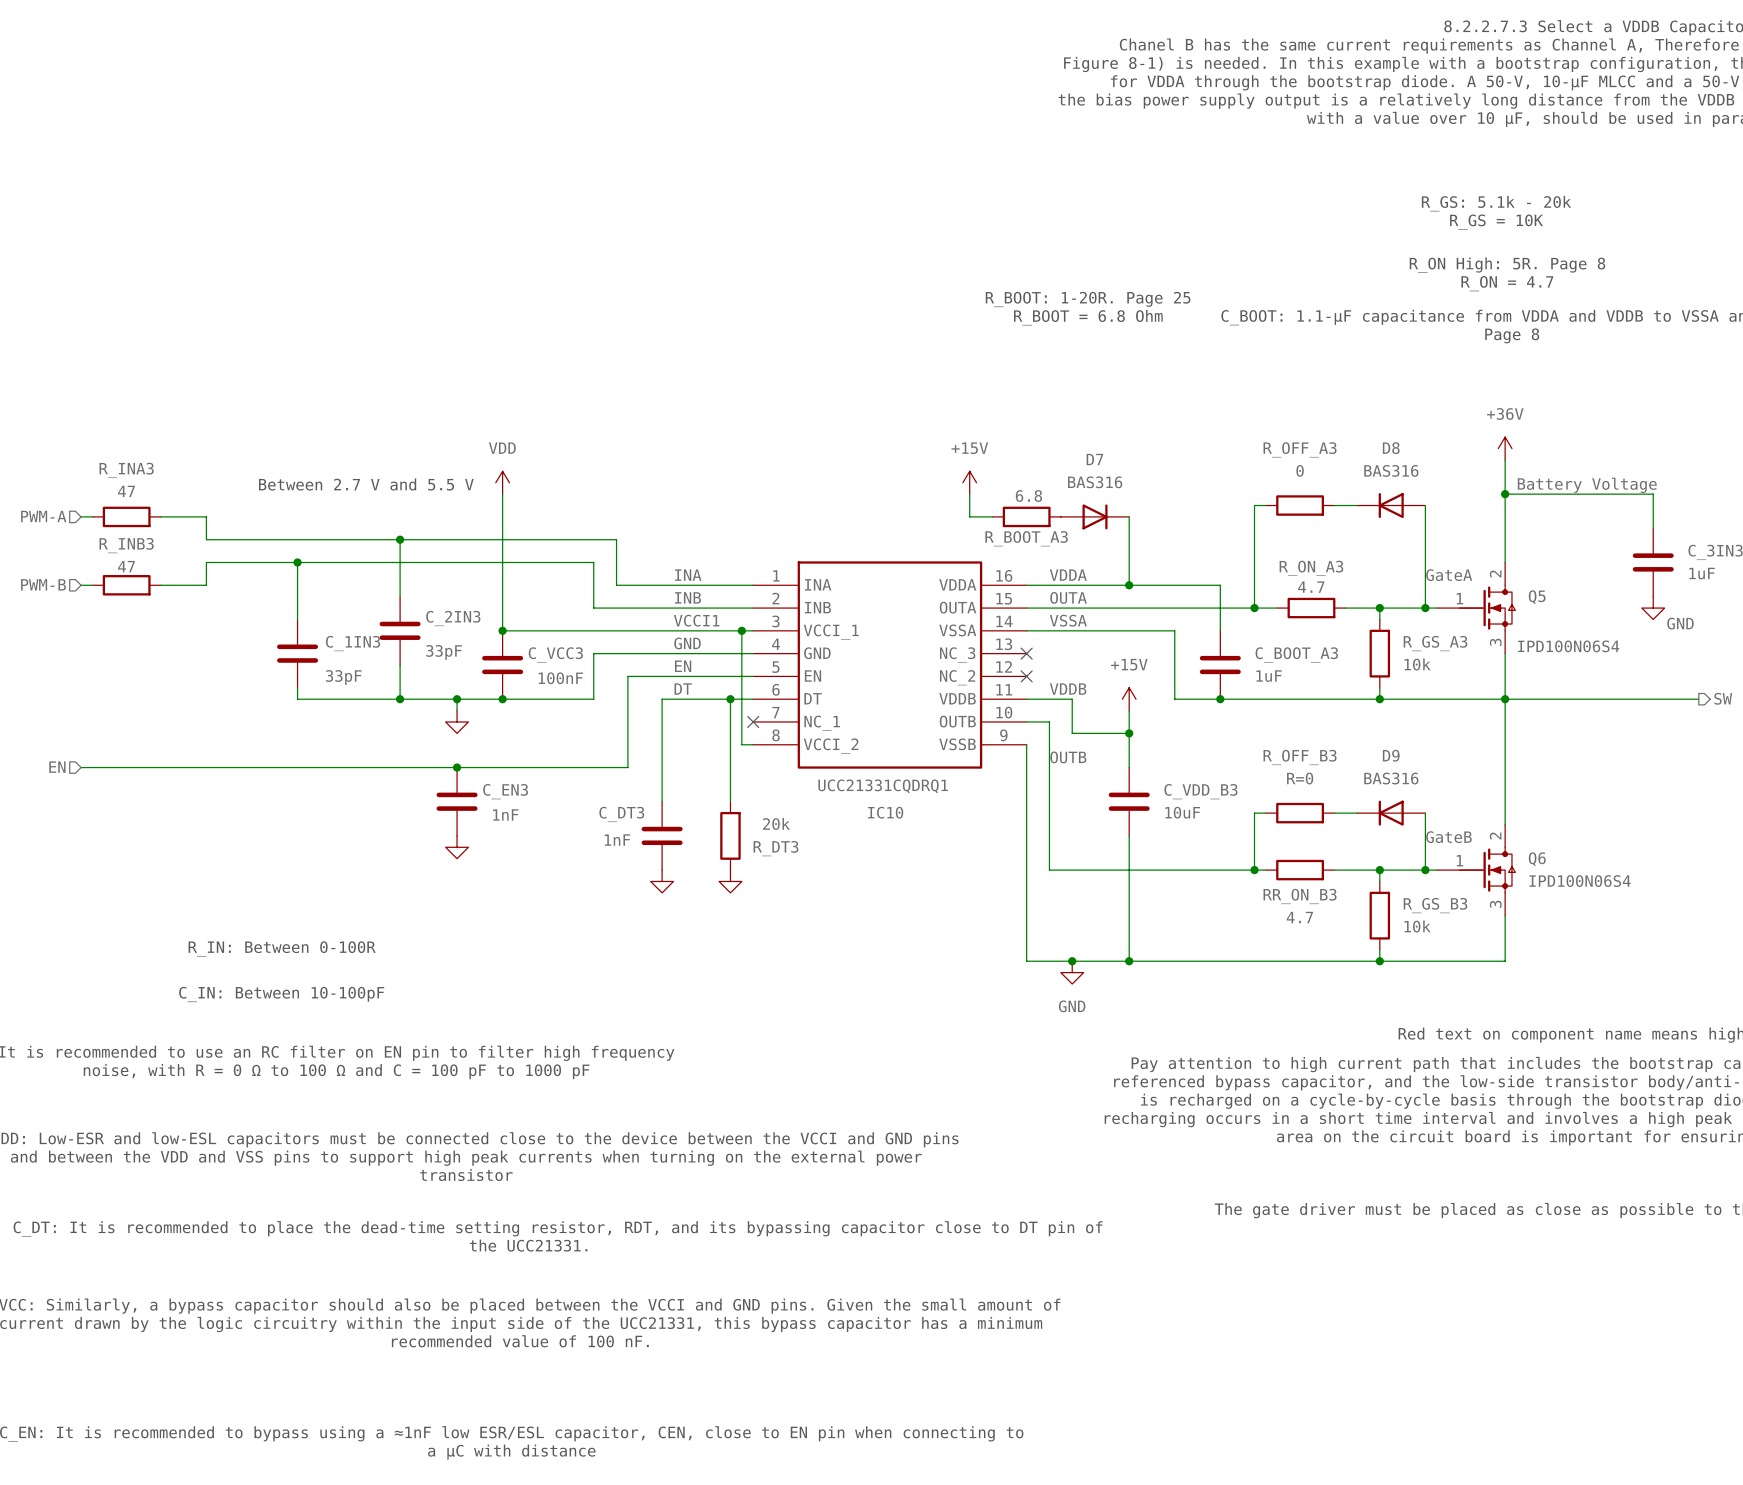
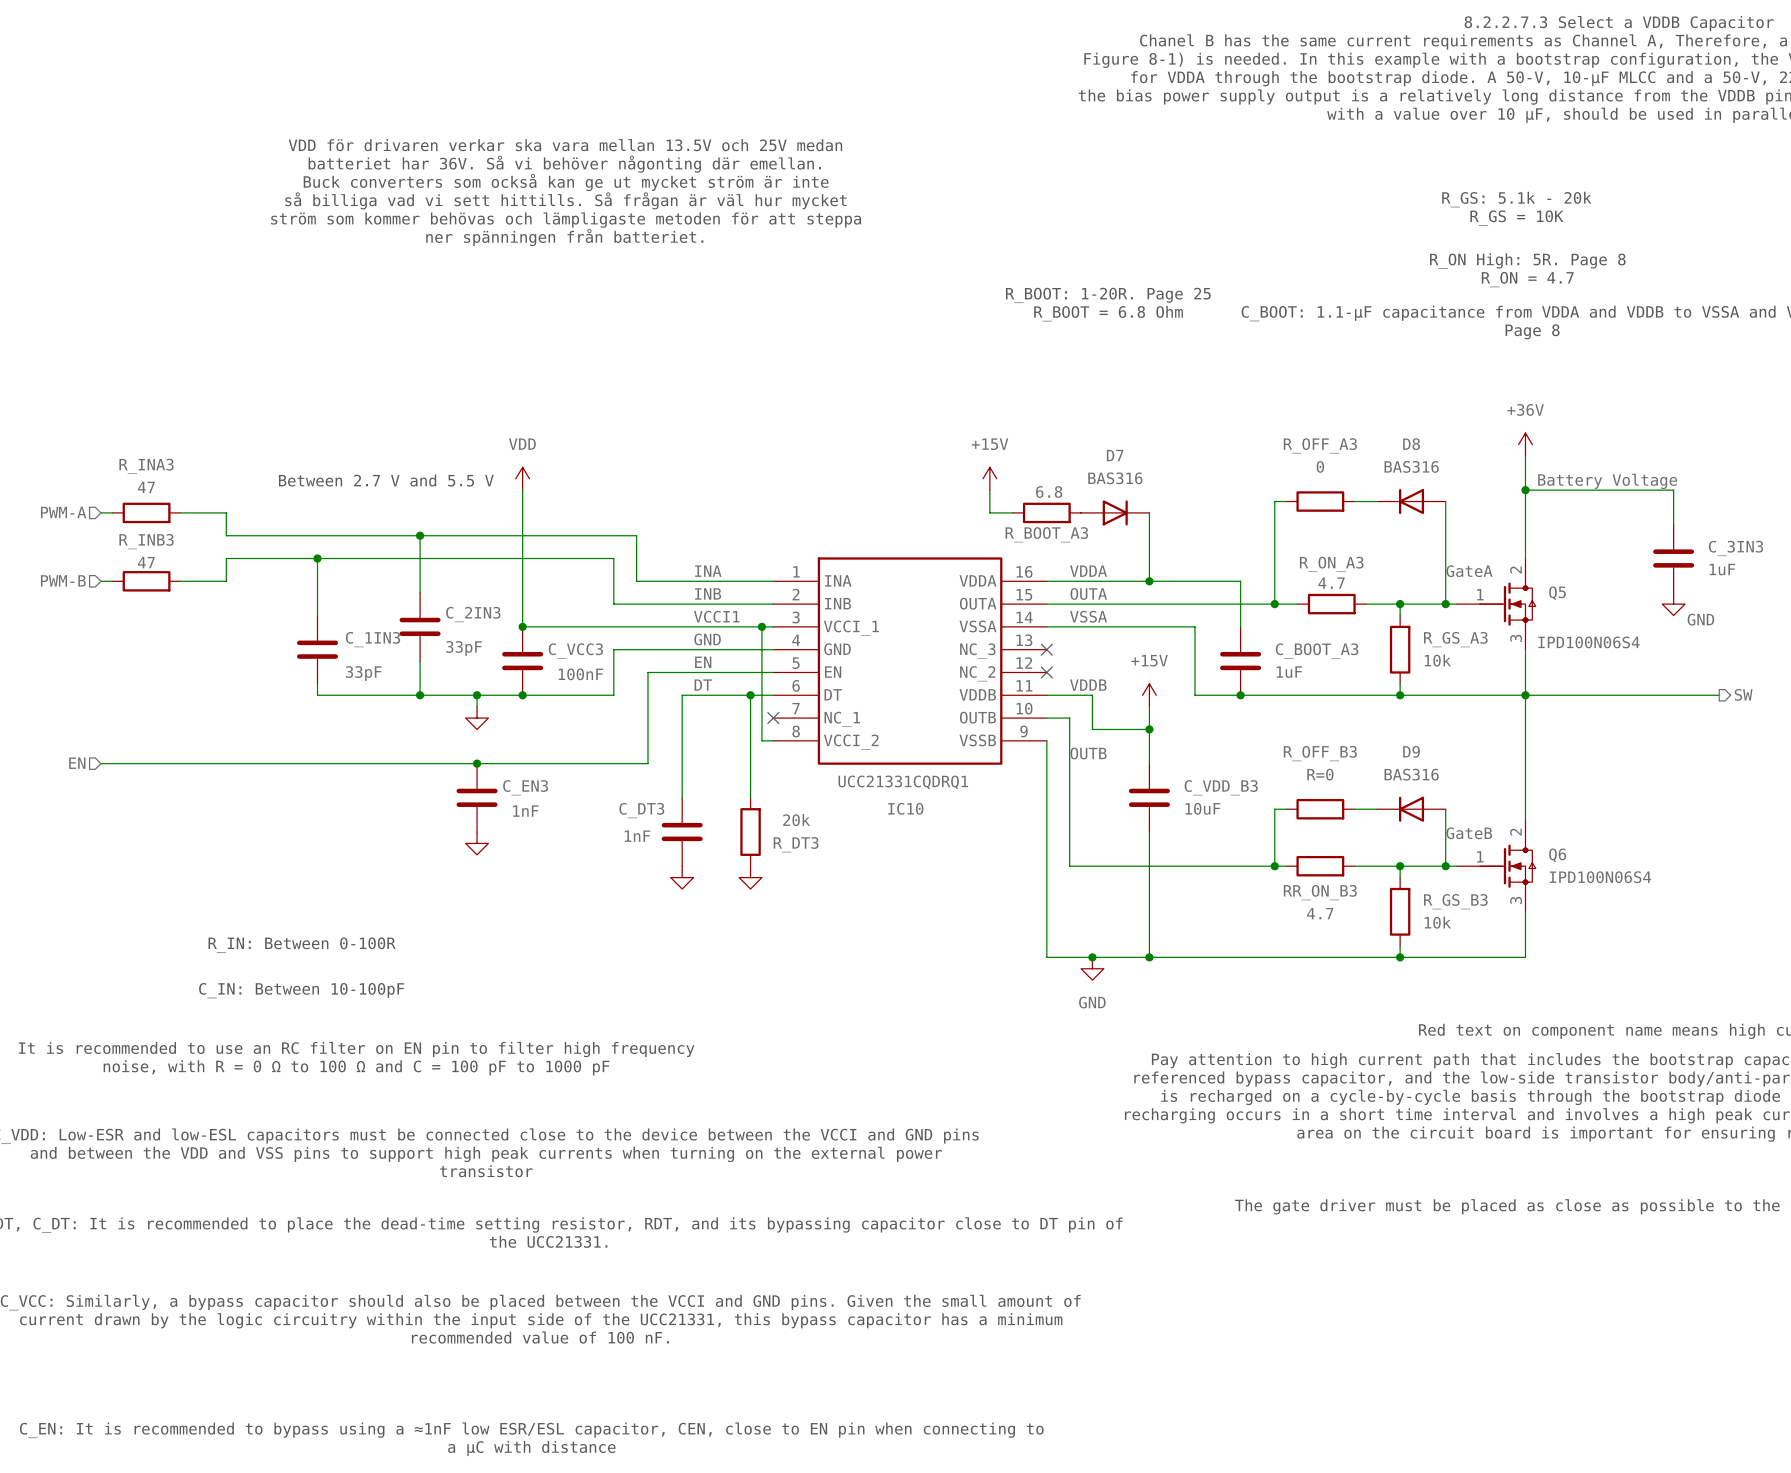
text: none -> VDD för drivaren verkar ska vara mellan 13.5V och 25V medan (565, 145)
text: none -> batteriet har 36V. Så vi behöver någonting där emellan. (564, 164)
text: none -> Buck converters som också kan ge ut mycket ström är inte (566, 182)
text: none -> så billiga vad vi sett hittills. Så frågan är väl hur mycket (565, 200)
text: none -> ström som kommer behövas och lämpligaste metoden för att steppa (566, 220)
text: none -> ner spänningen från batteriet. (564, 237)

